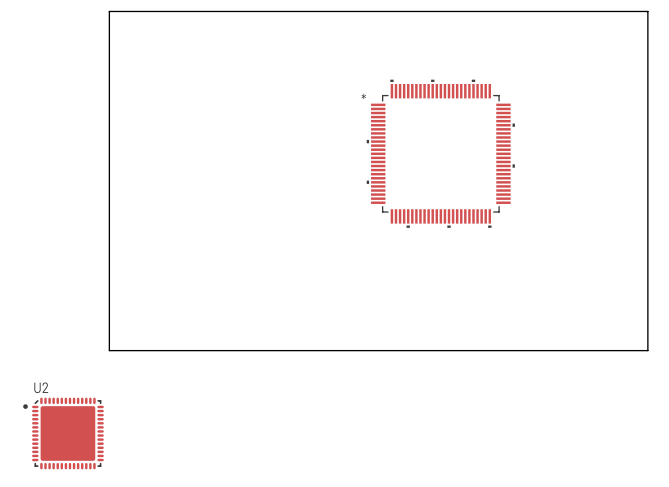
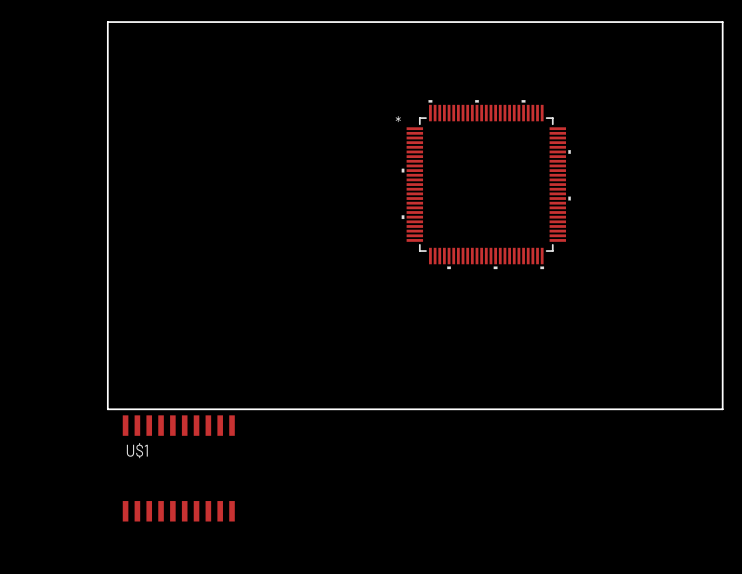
U$1: none -> (178, 468)
U2: (63, 433) -> none

